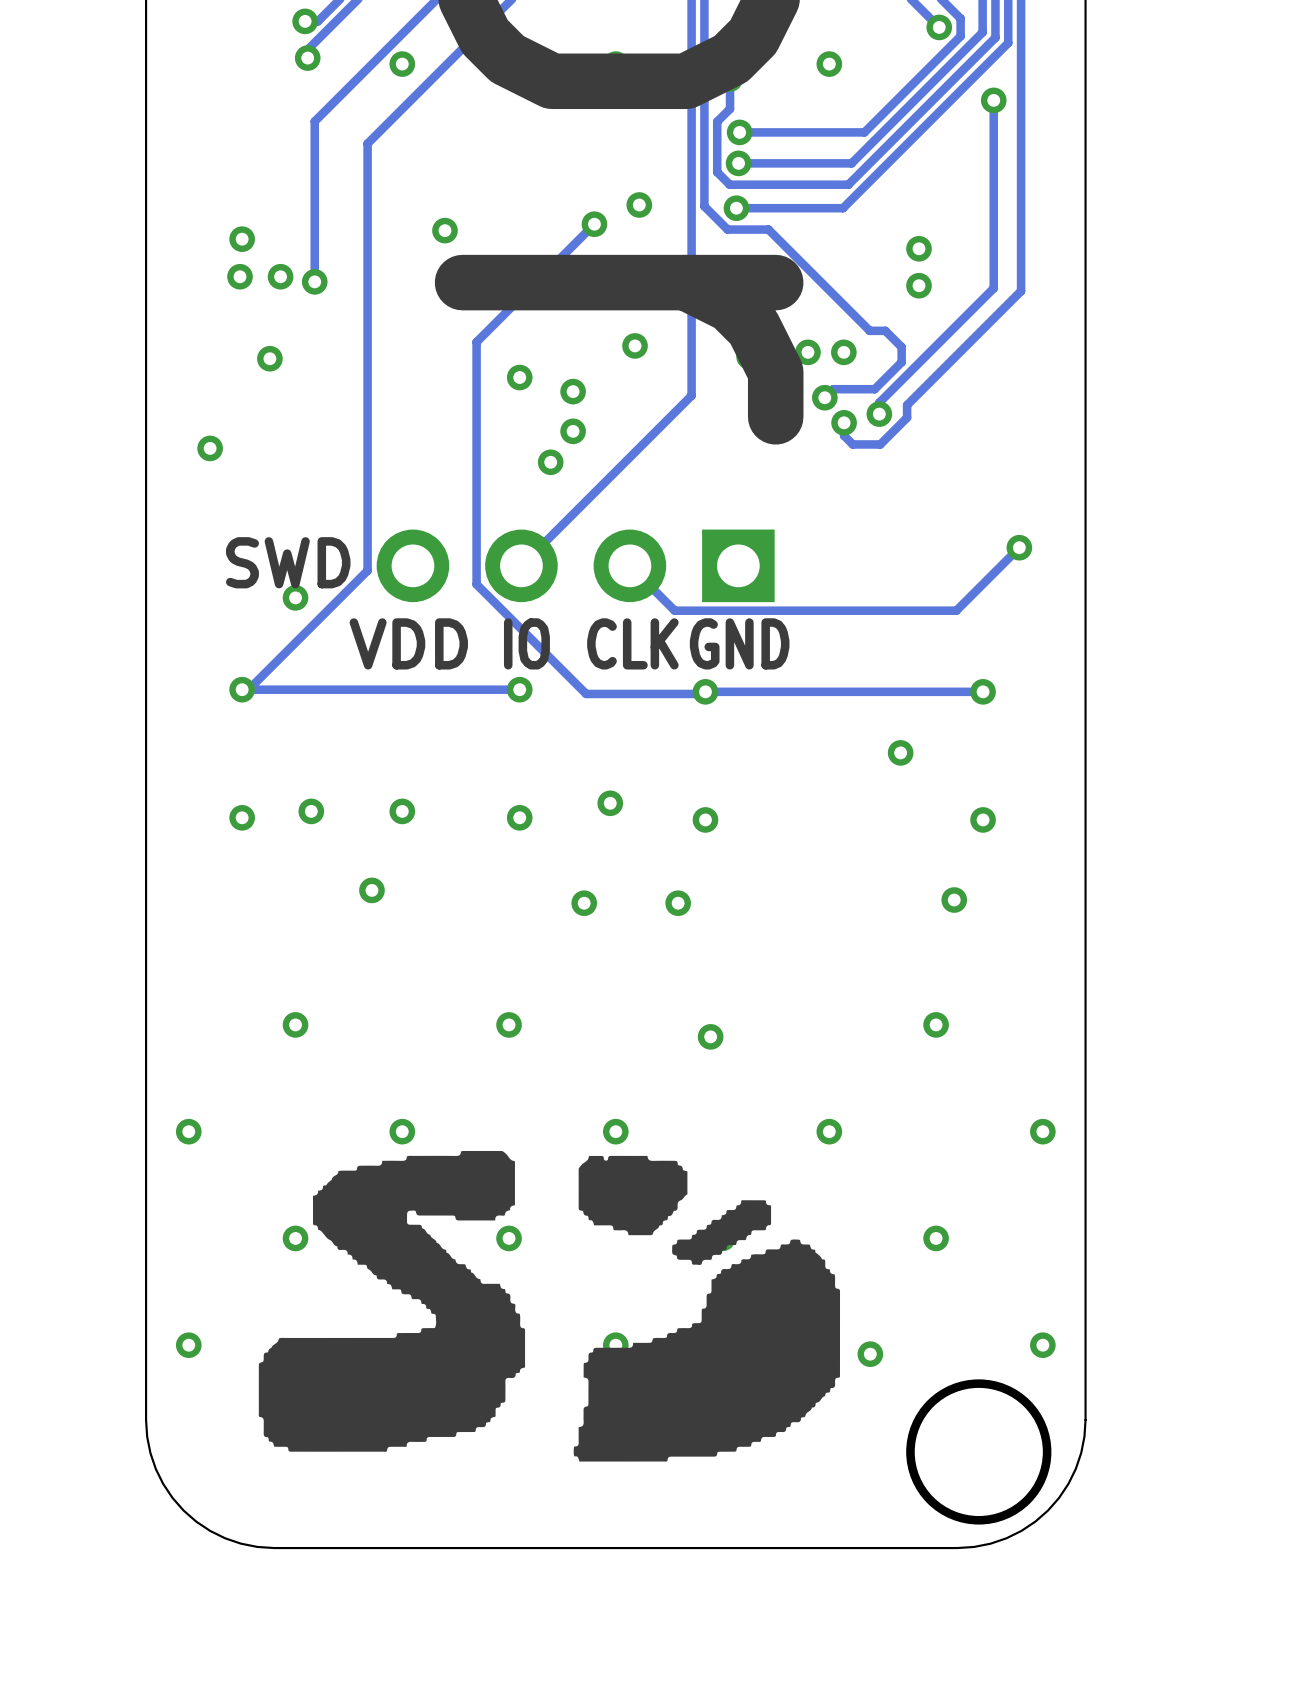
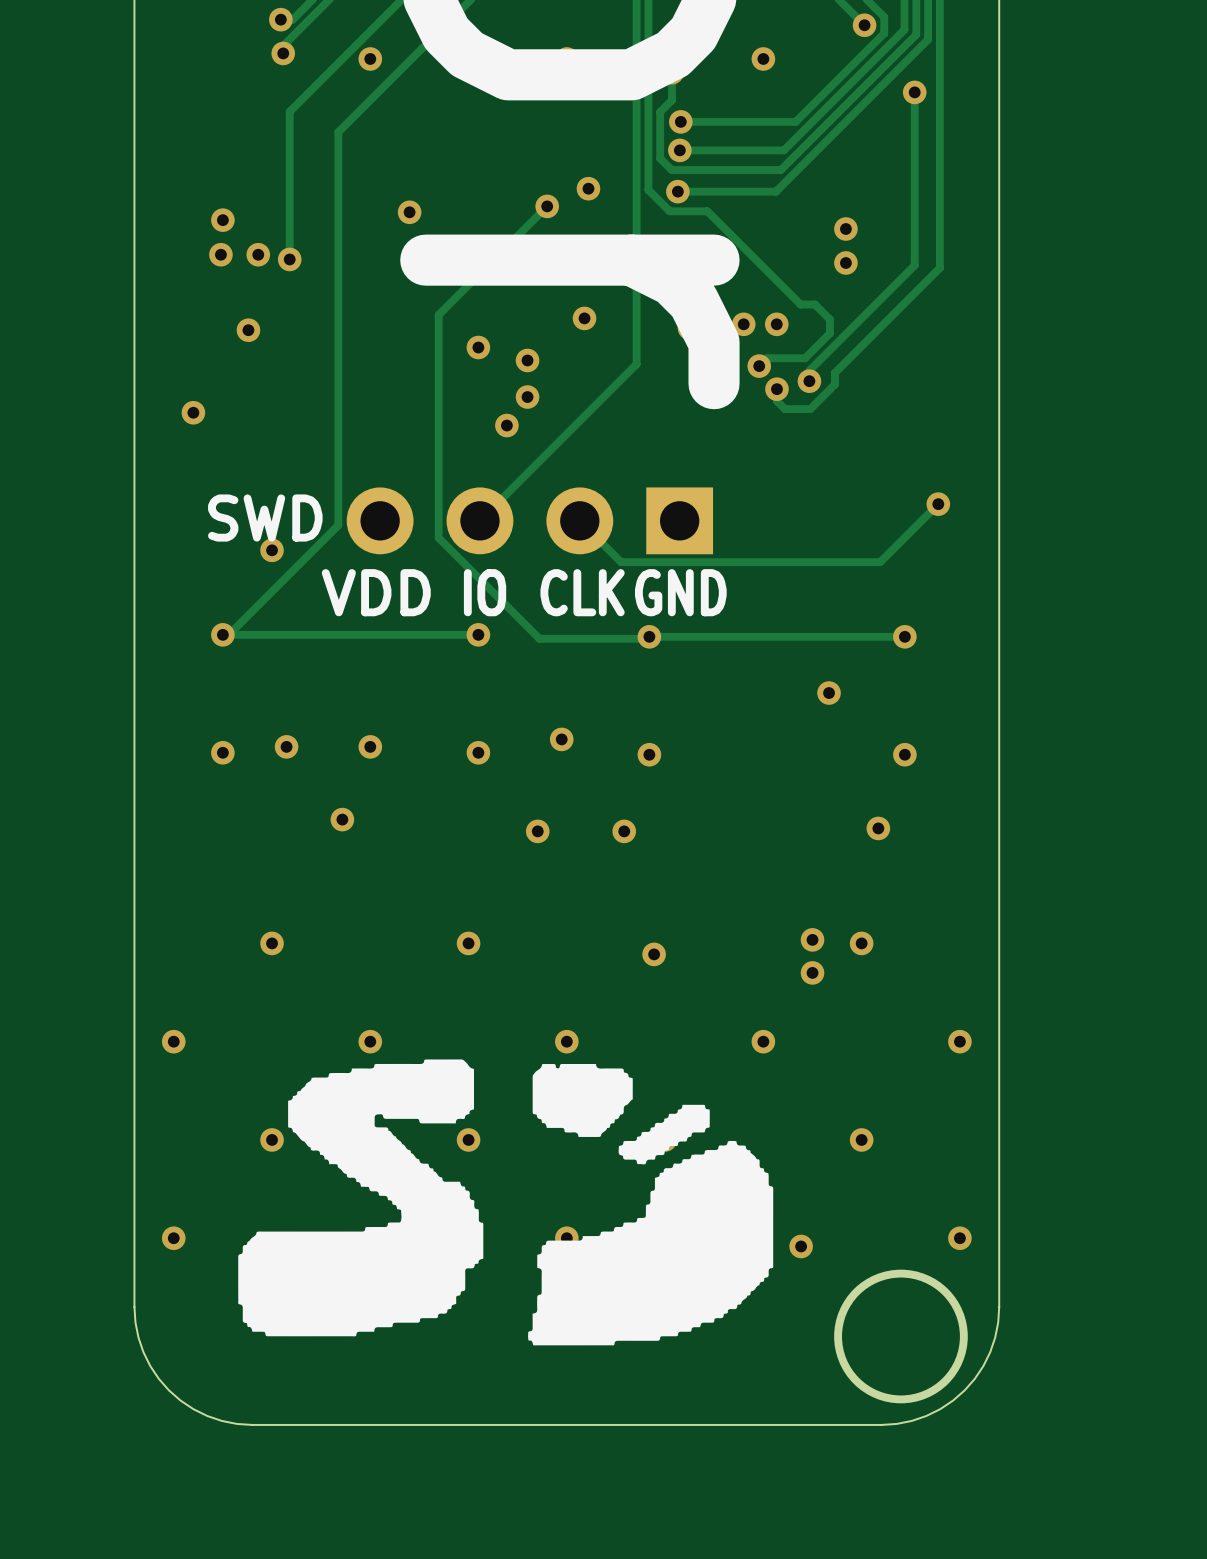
via: none -> (812, 939)
via: none -> (812, 972)

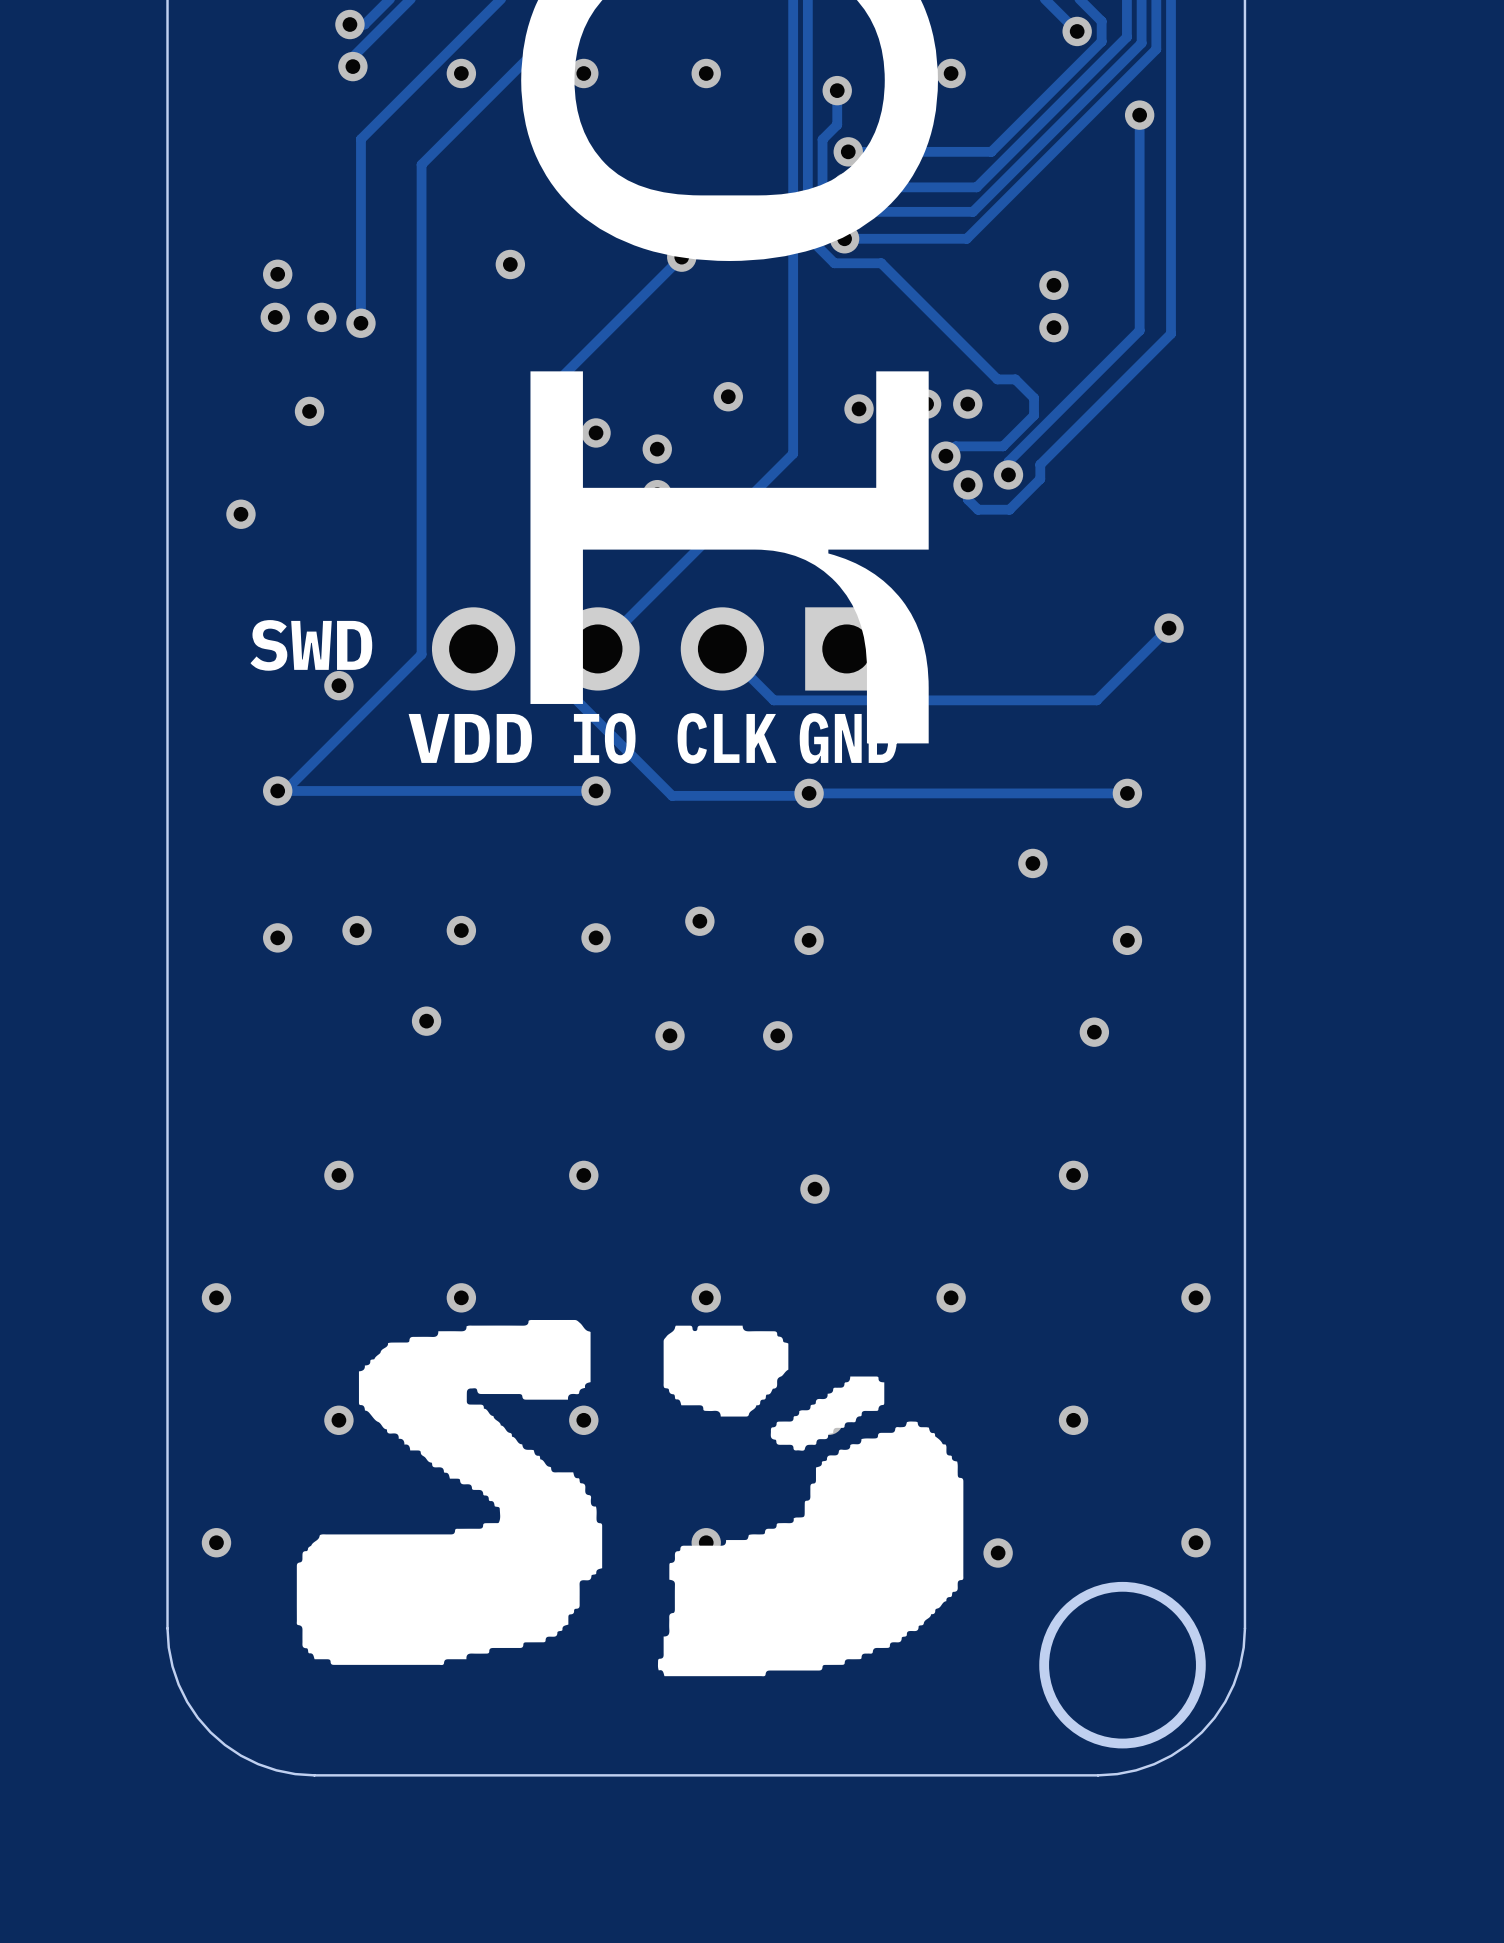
via: (812, 939) -> none
via: (812, 972) -> none

